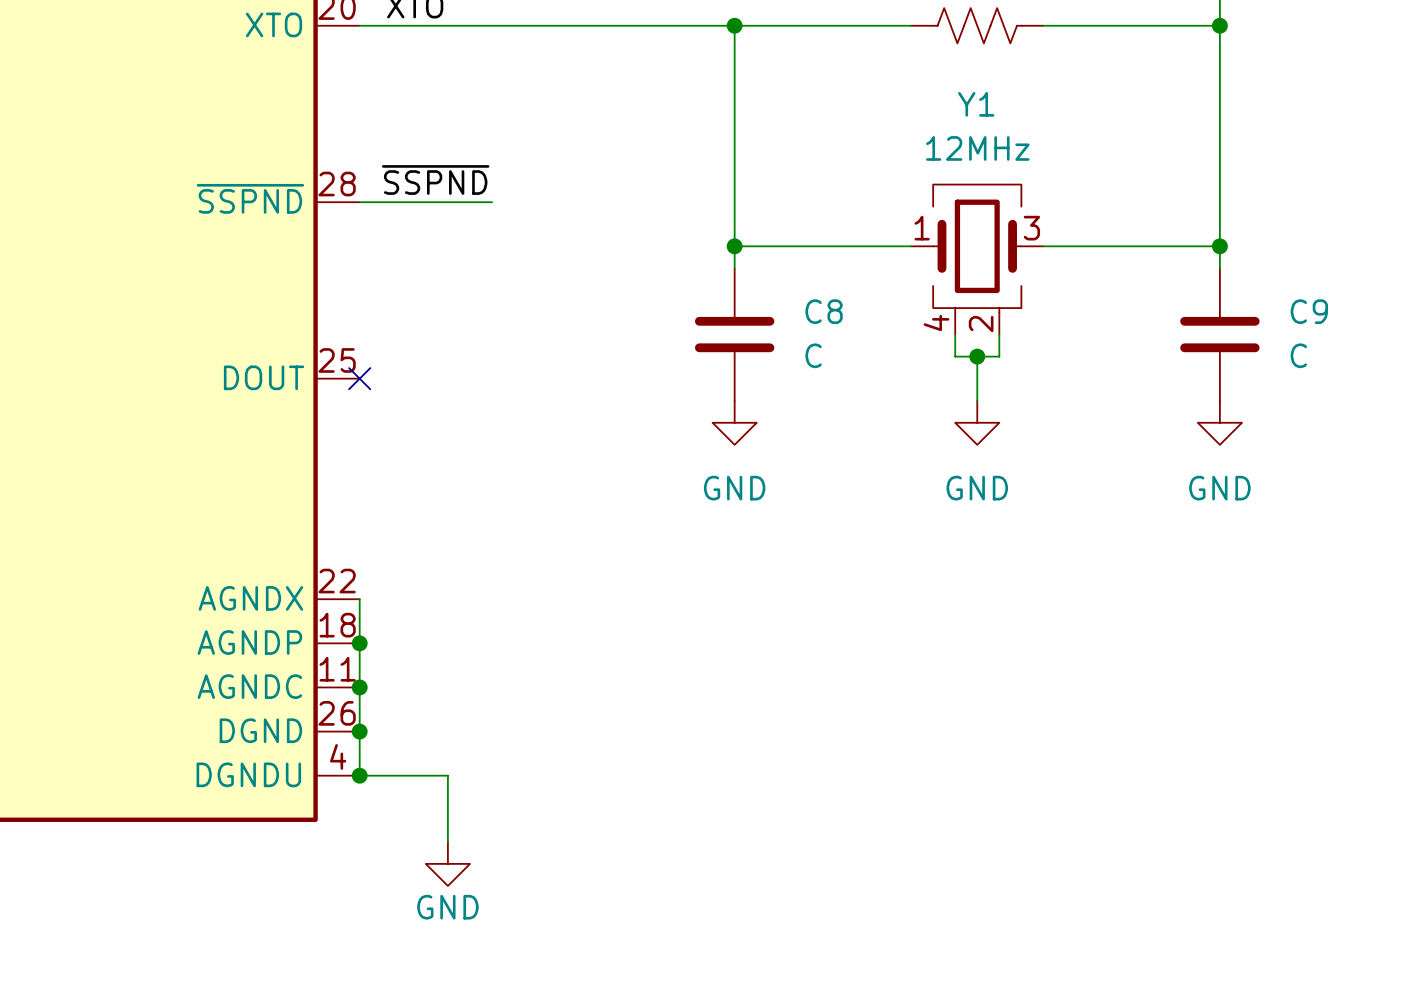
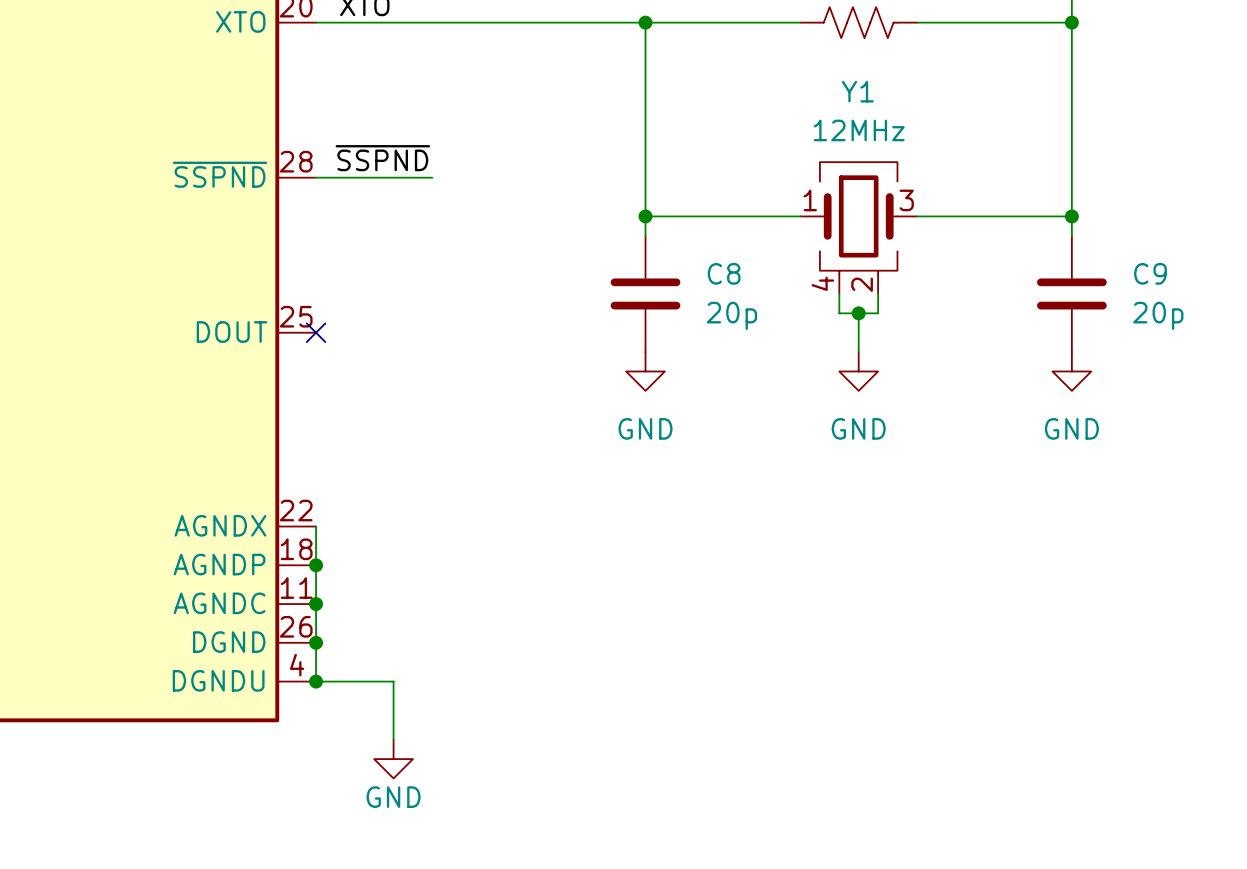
C8 value: C (813, 355) -> 20p (731, 315)
C9 value: C (1298, 355) -> 20p (1158, 315)

